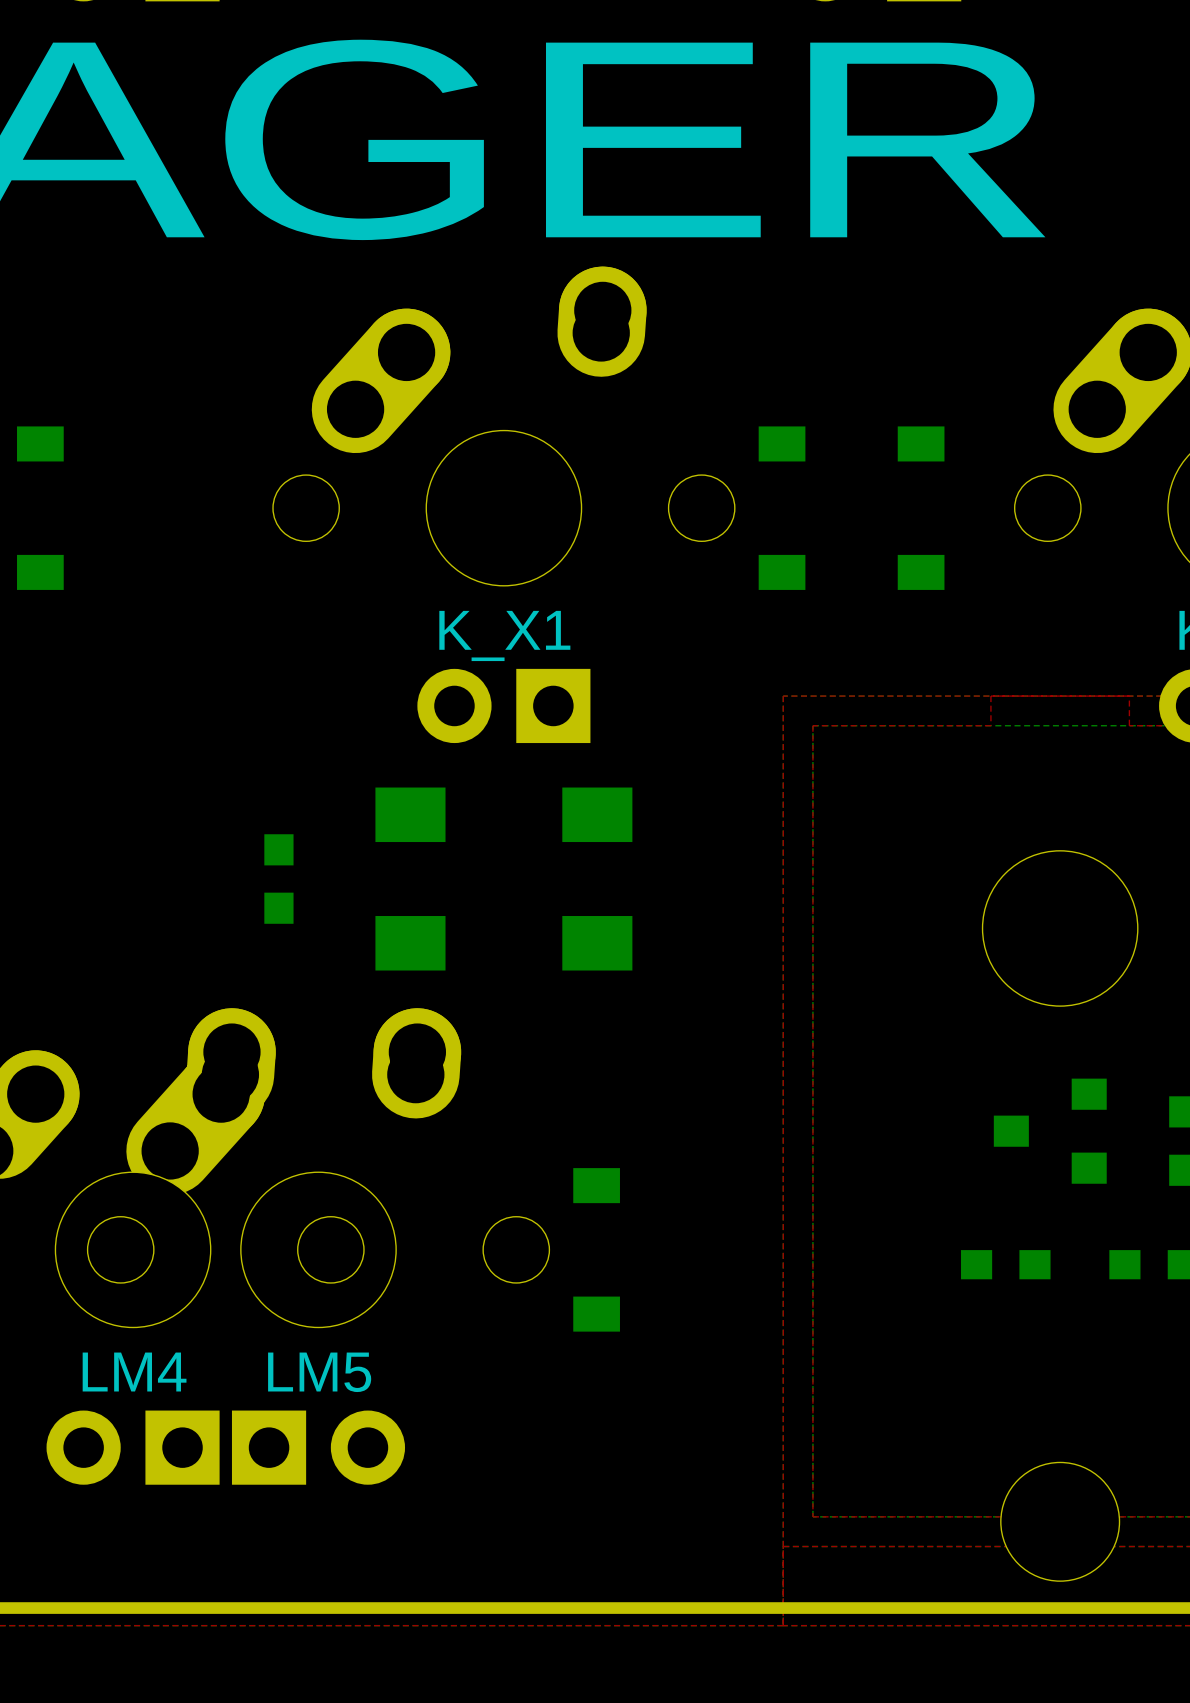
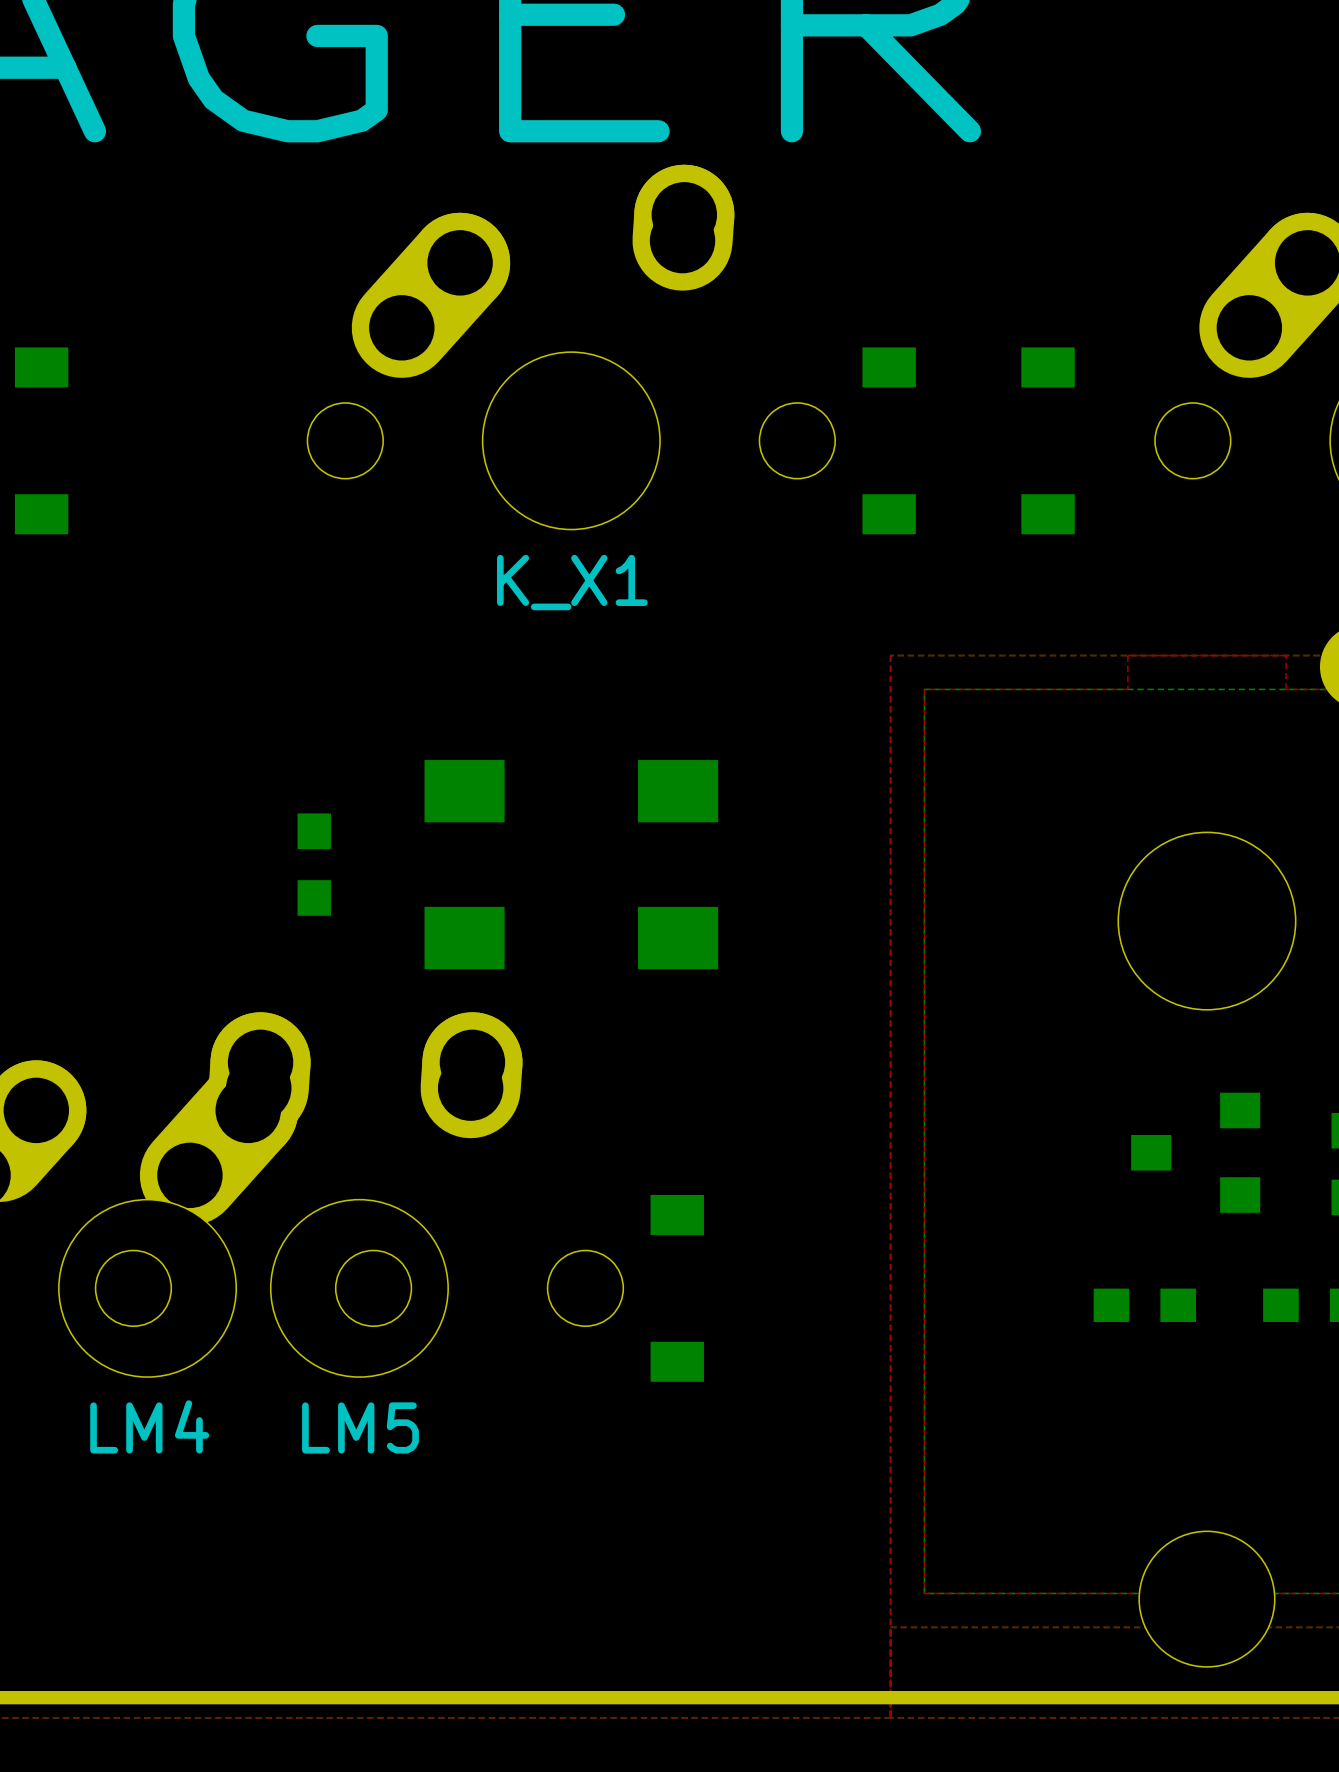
part: (503, 705) -> none
part: (133, 1447) -> none
part: (318, 1447) -> none

